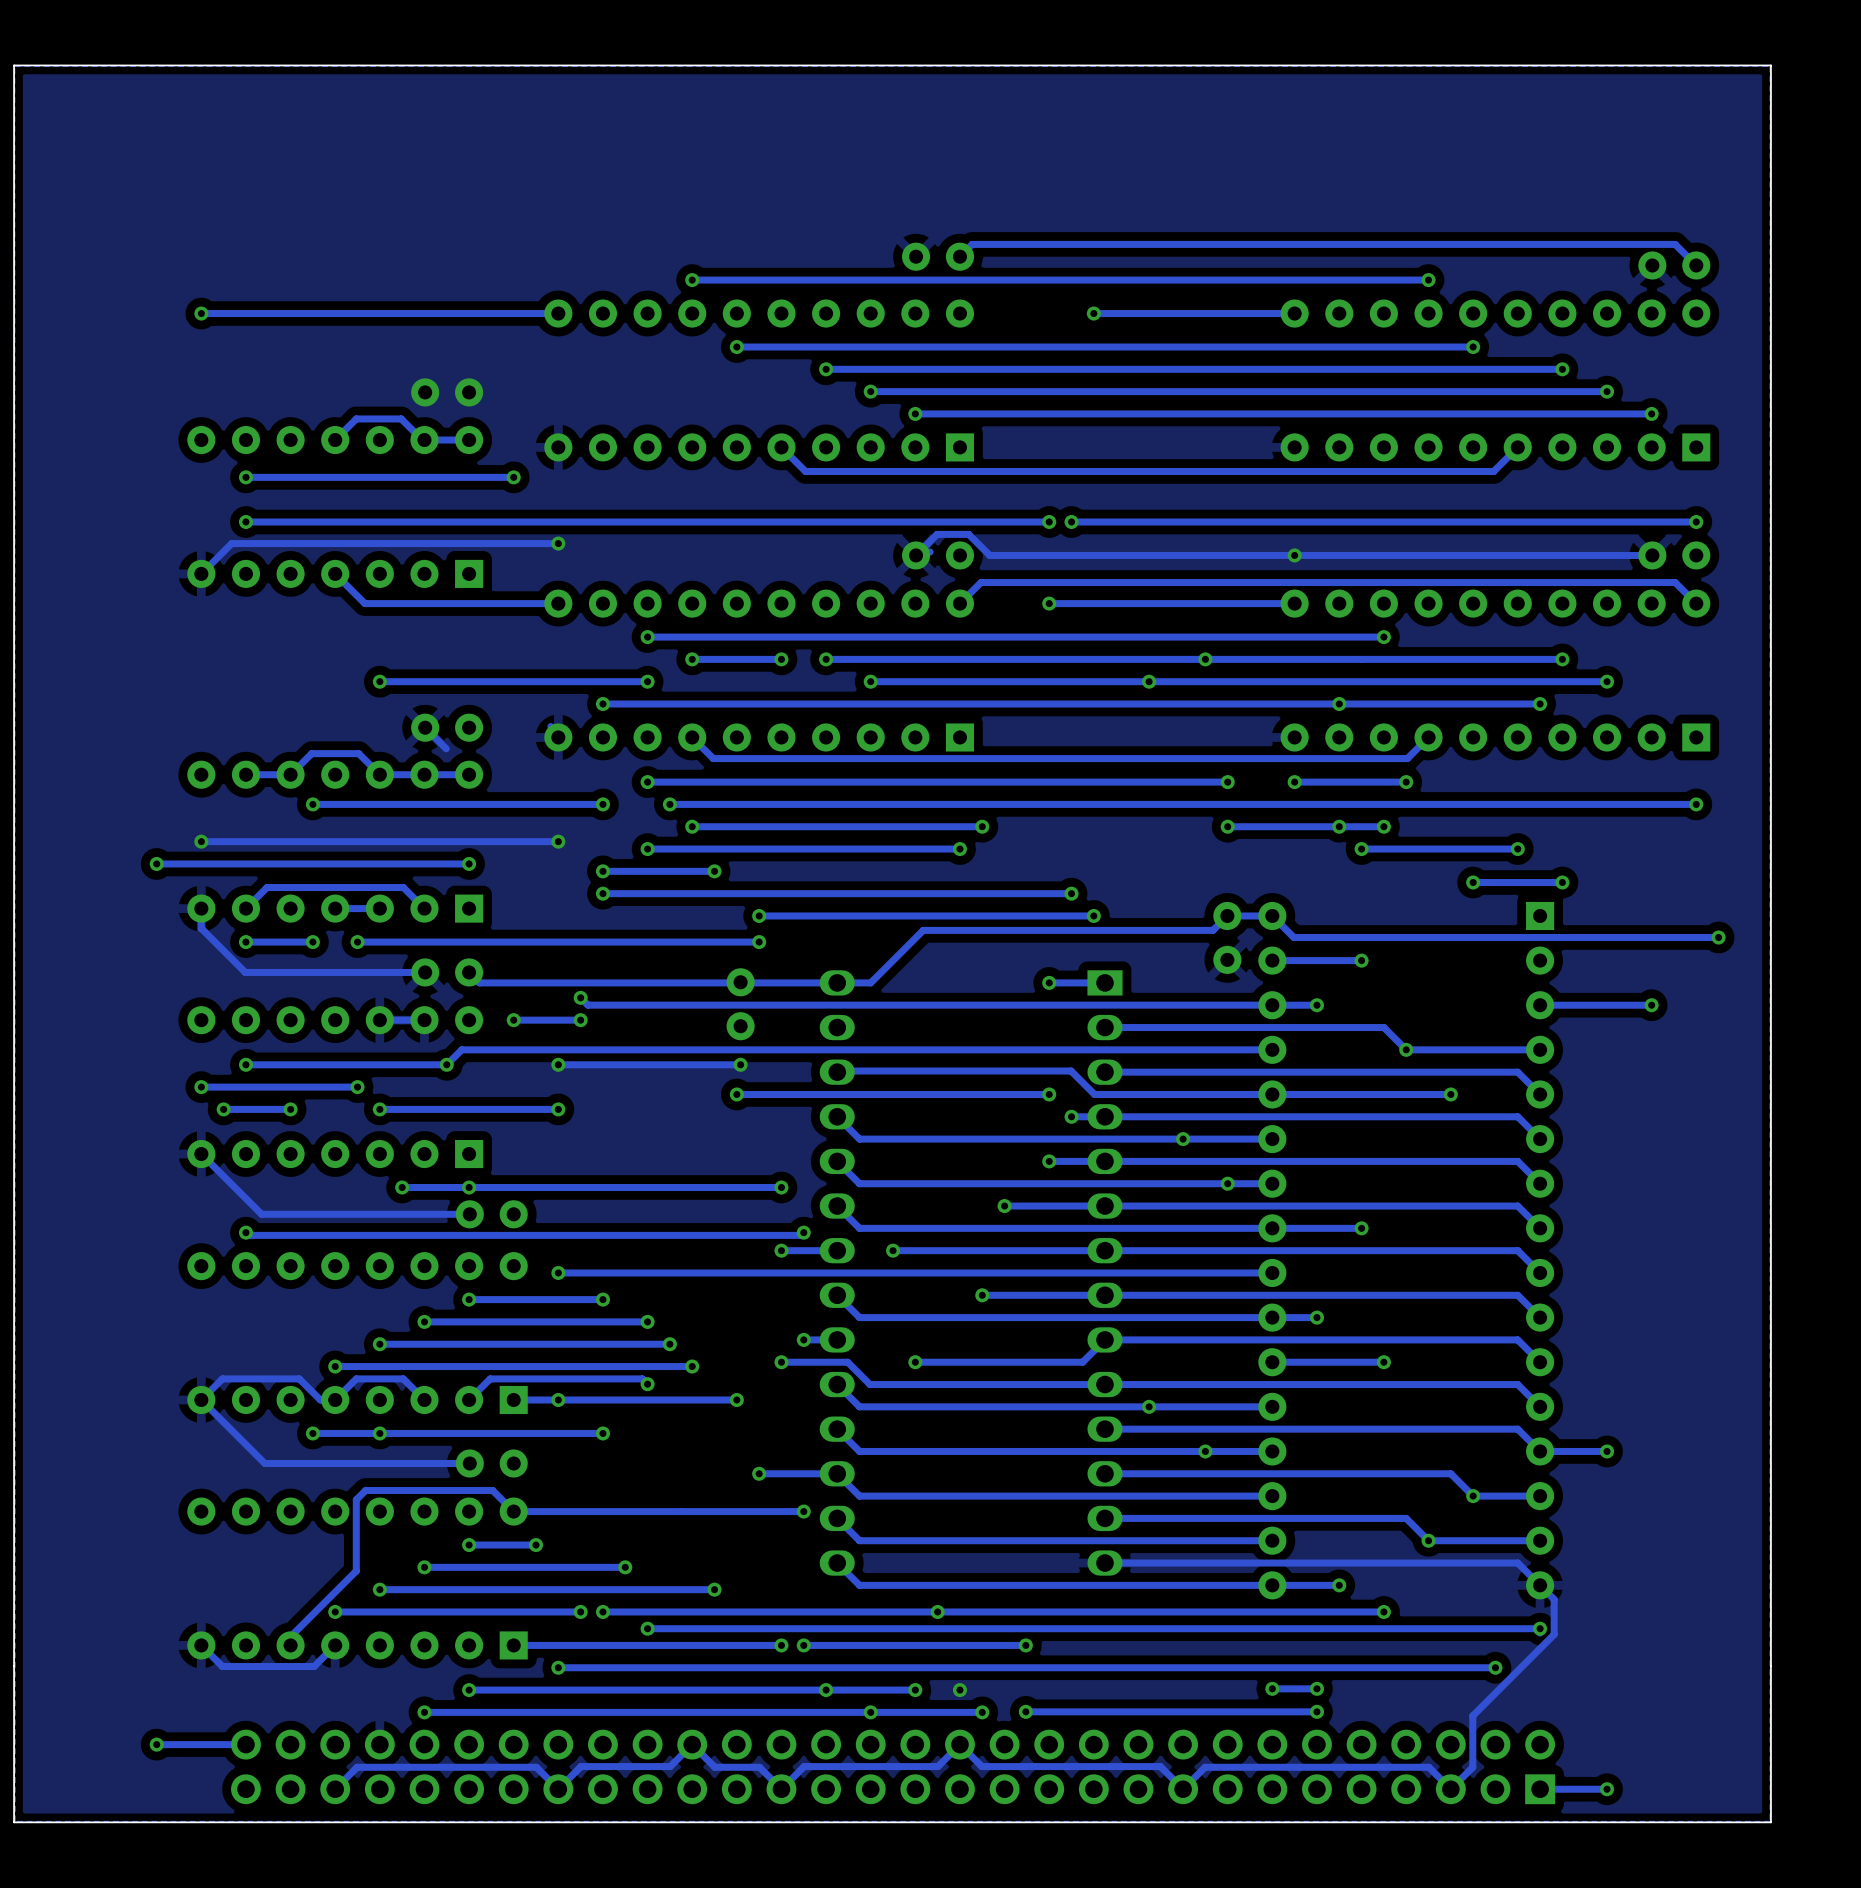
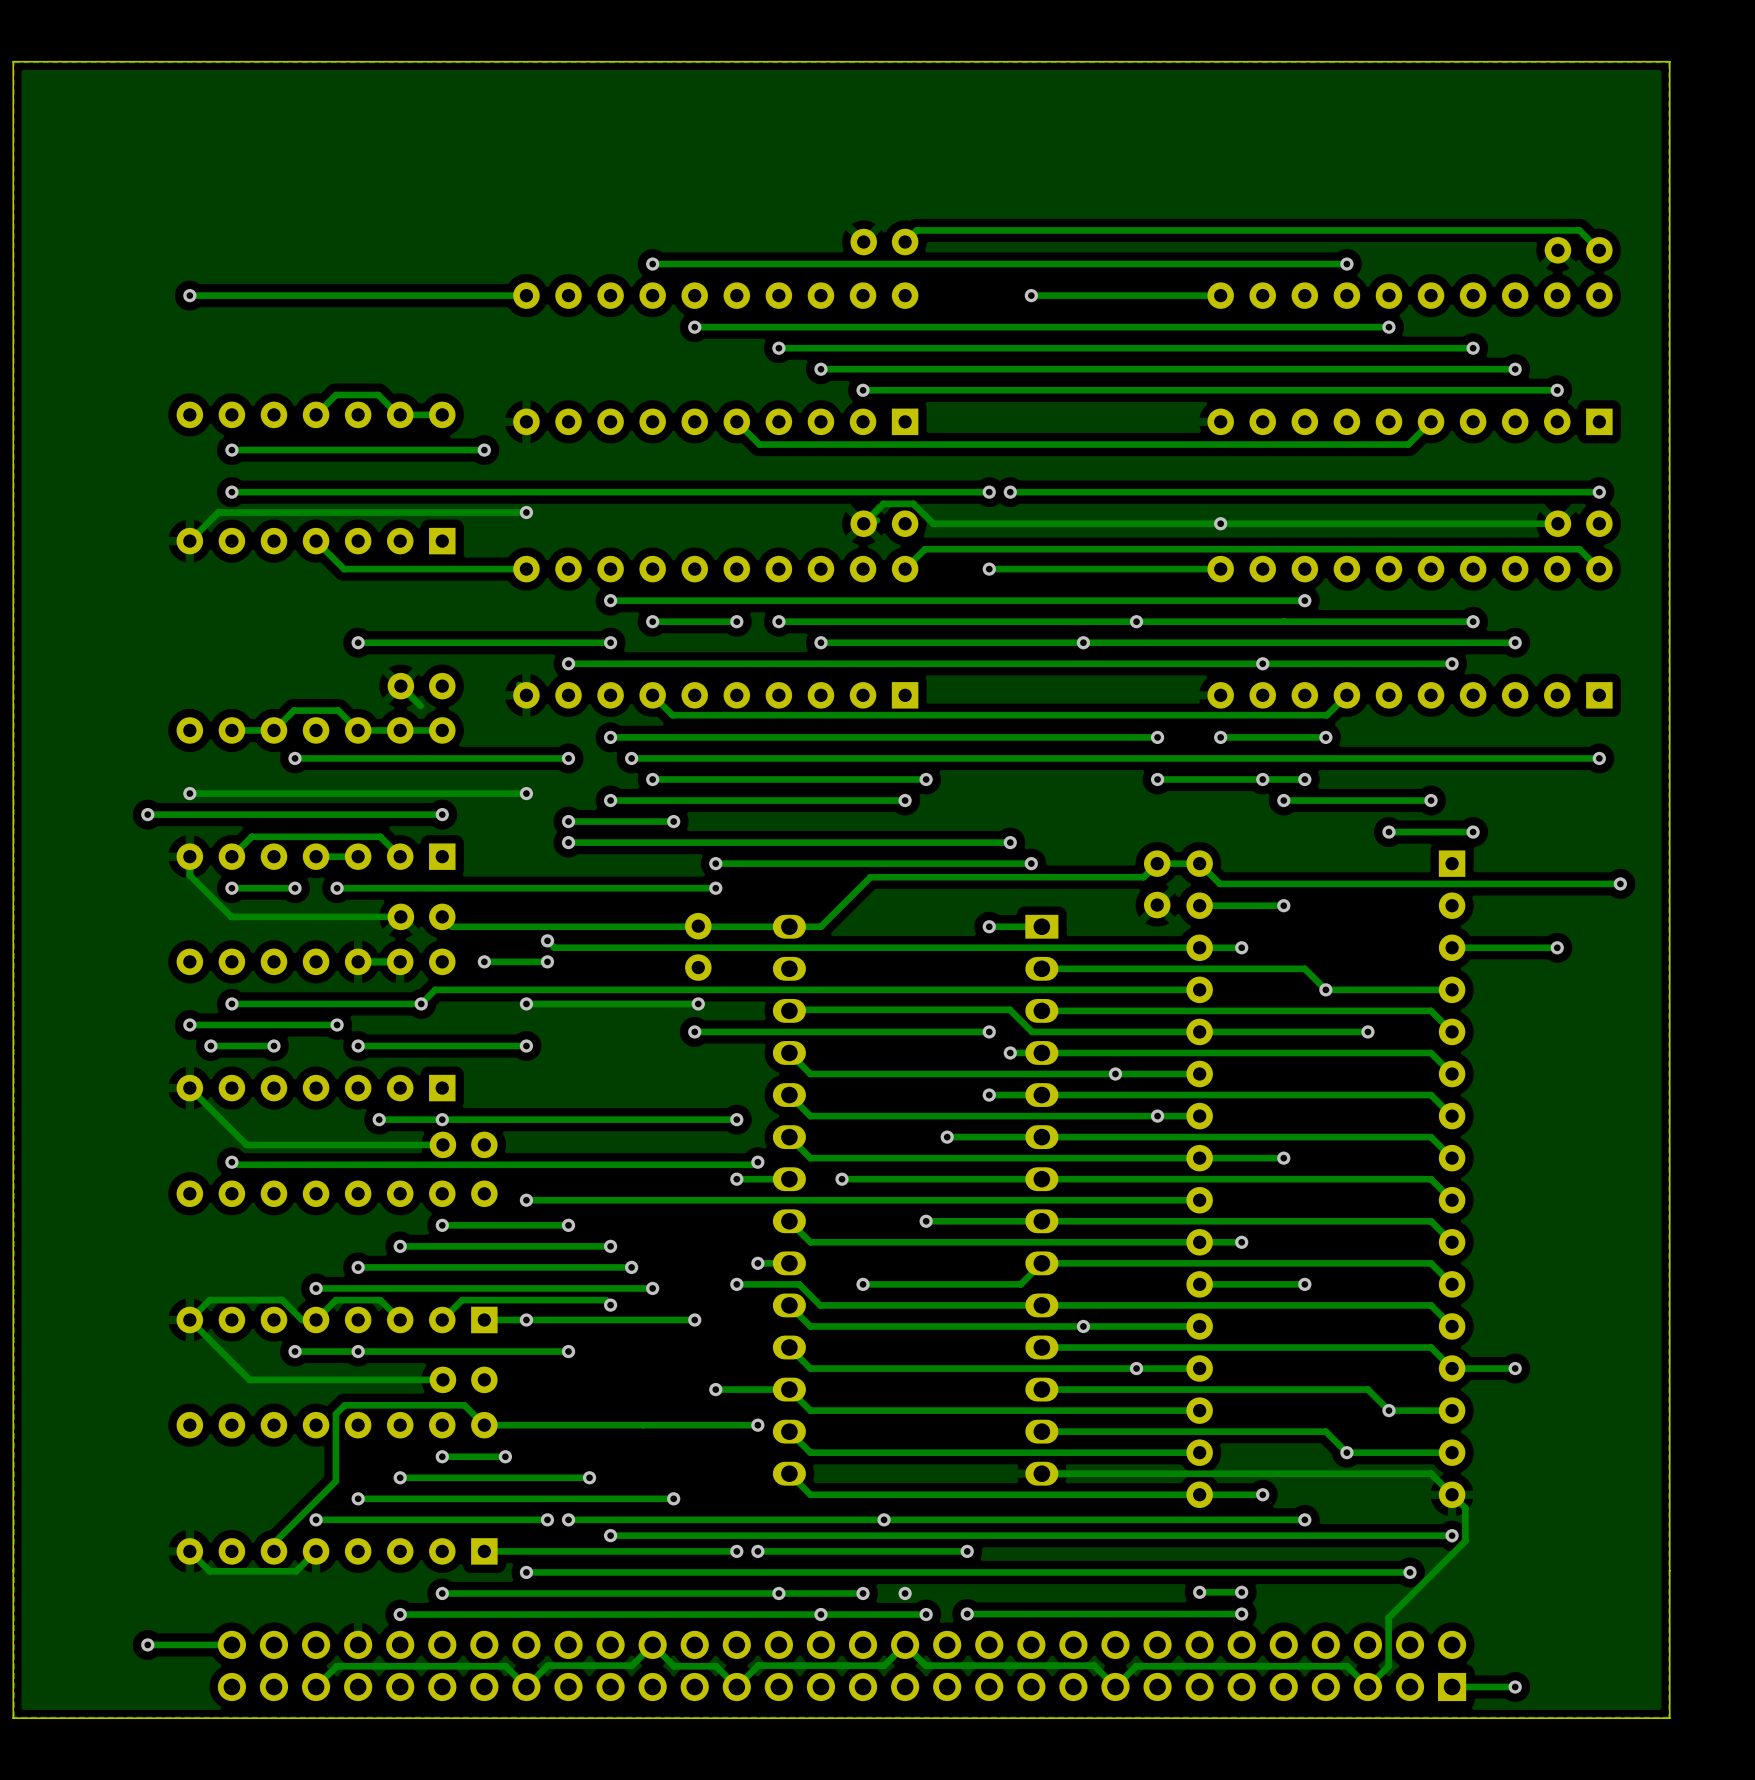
part: (447, 392) -> none

